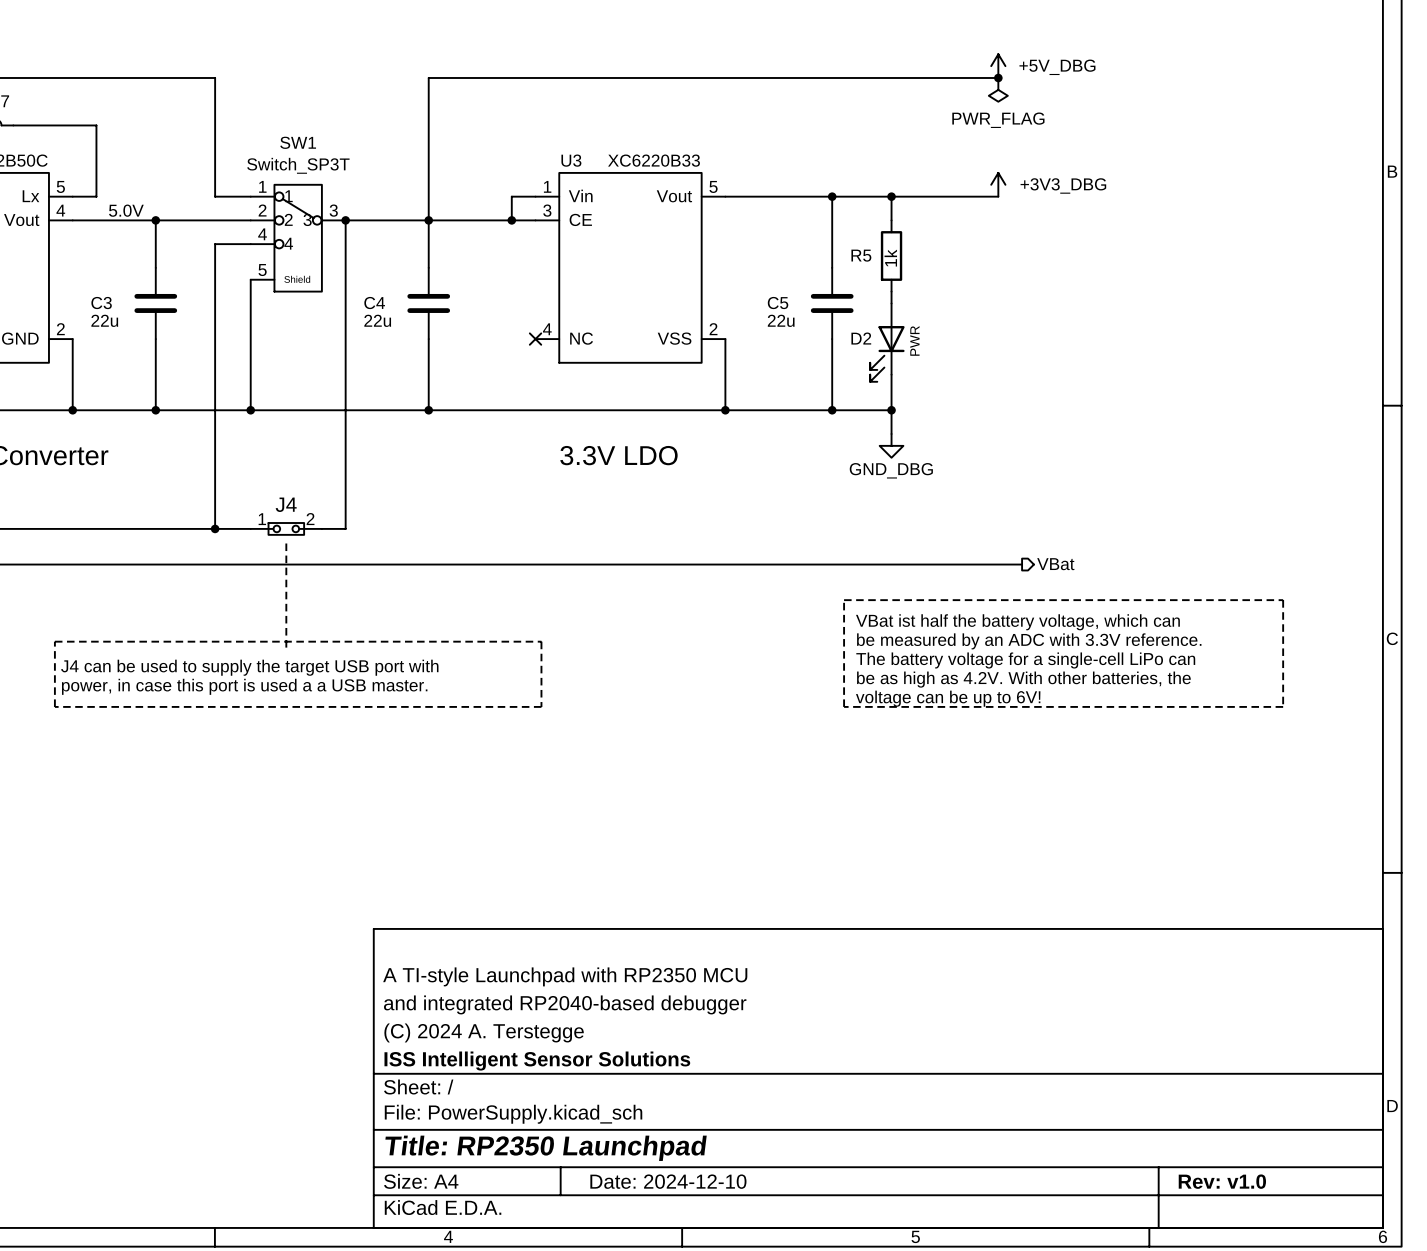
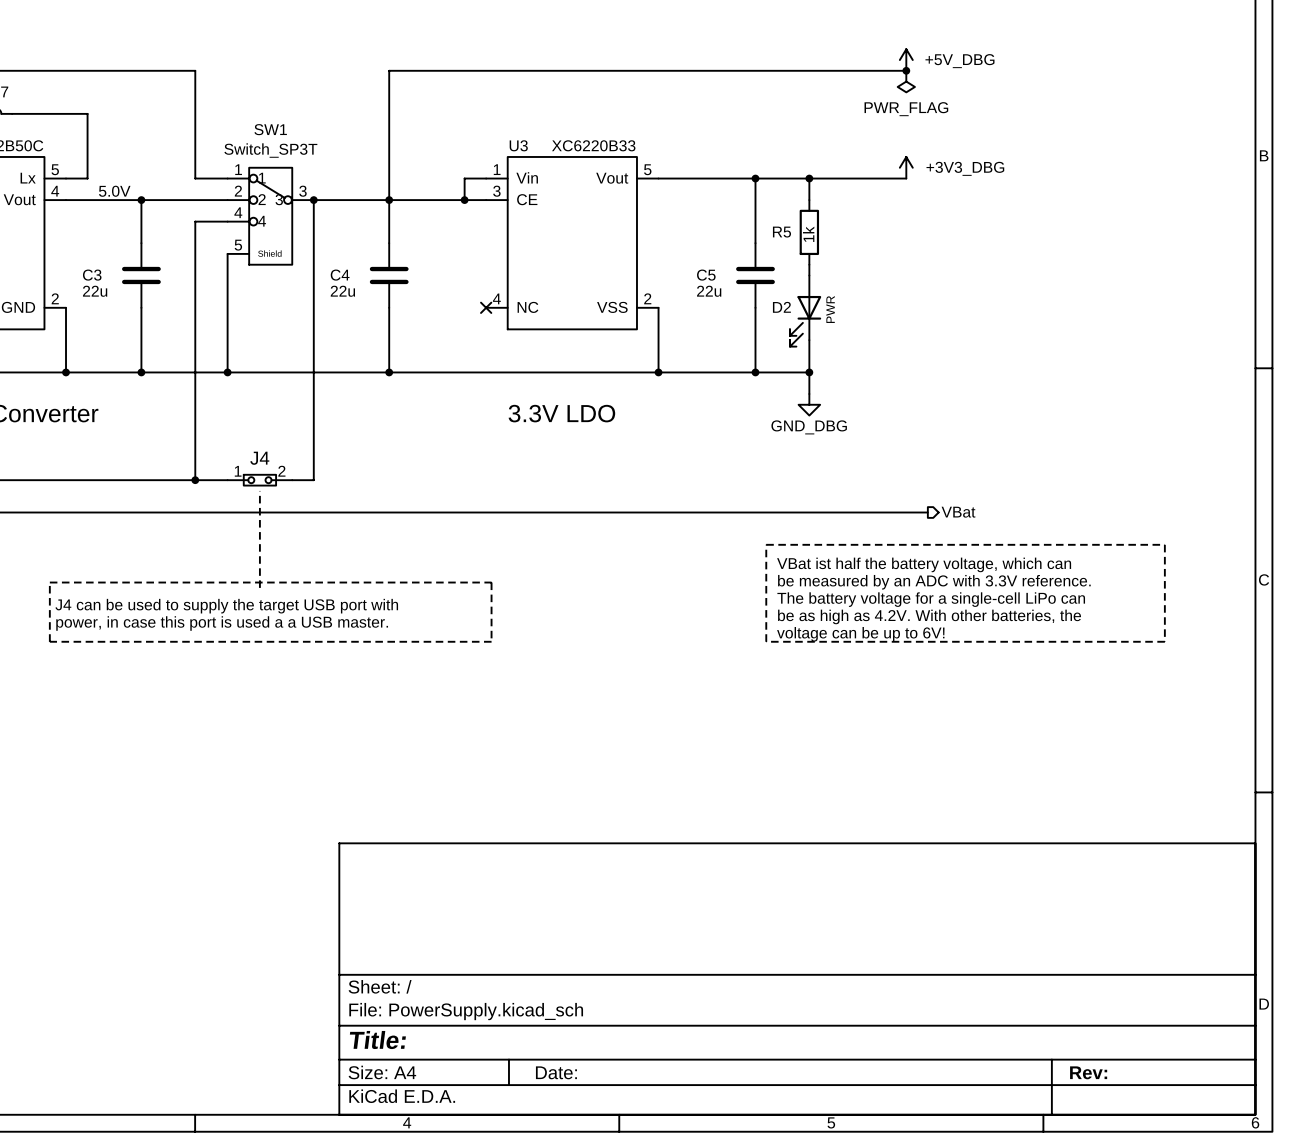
title block: A TI-style Launchpad with RP2350 MCU (565, 976) -> none
title block: and integrated RP2040-based debugger (565, 1004) -> none
title block: (C) 2024 A. Terstegge (484, 1032) -> none
title block: ISS Intelligent Sensor Solutions (537, 1061) -> none
title block: Title: RP2350 Launchpad (546, 1148) -> Title: (377, 1040)
title block: Date: 2024-12-10 (668, 1181) -> Date: (556, 1072)
title block: Rev: v1.0 (1222, 1181) -> Rev: (1088, 1072)

